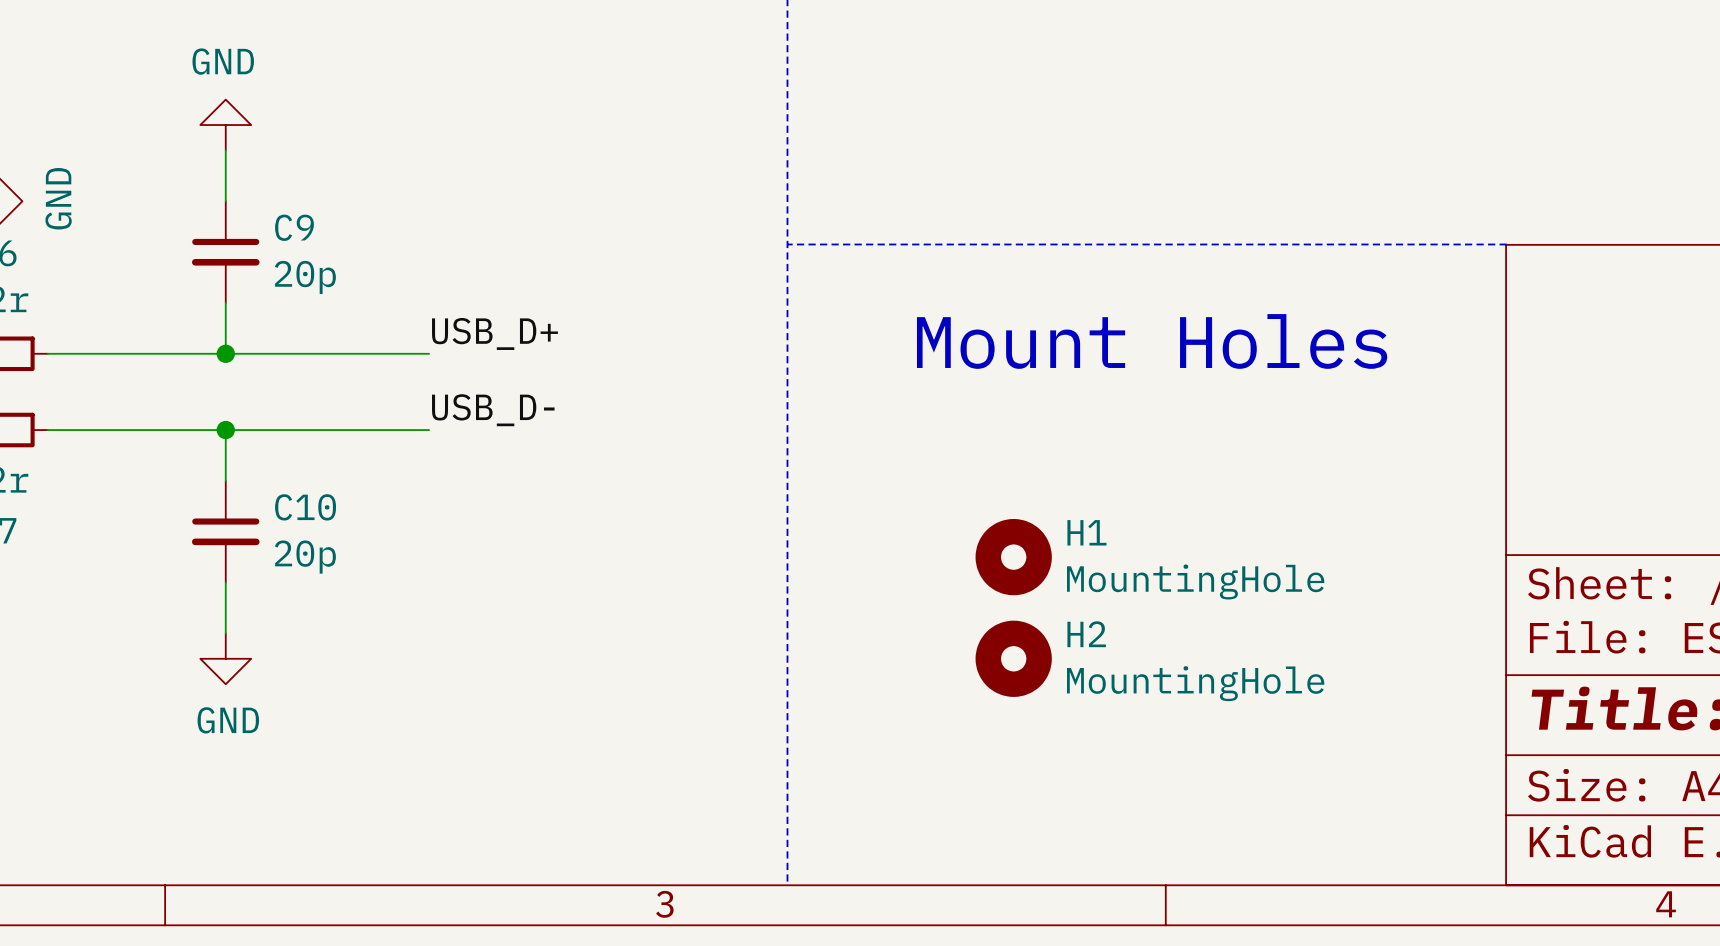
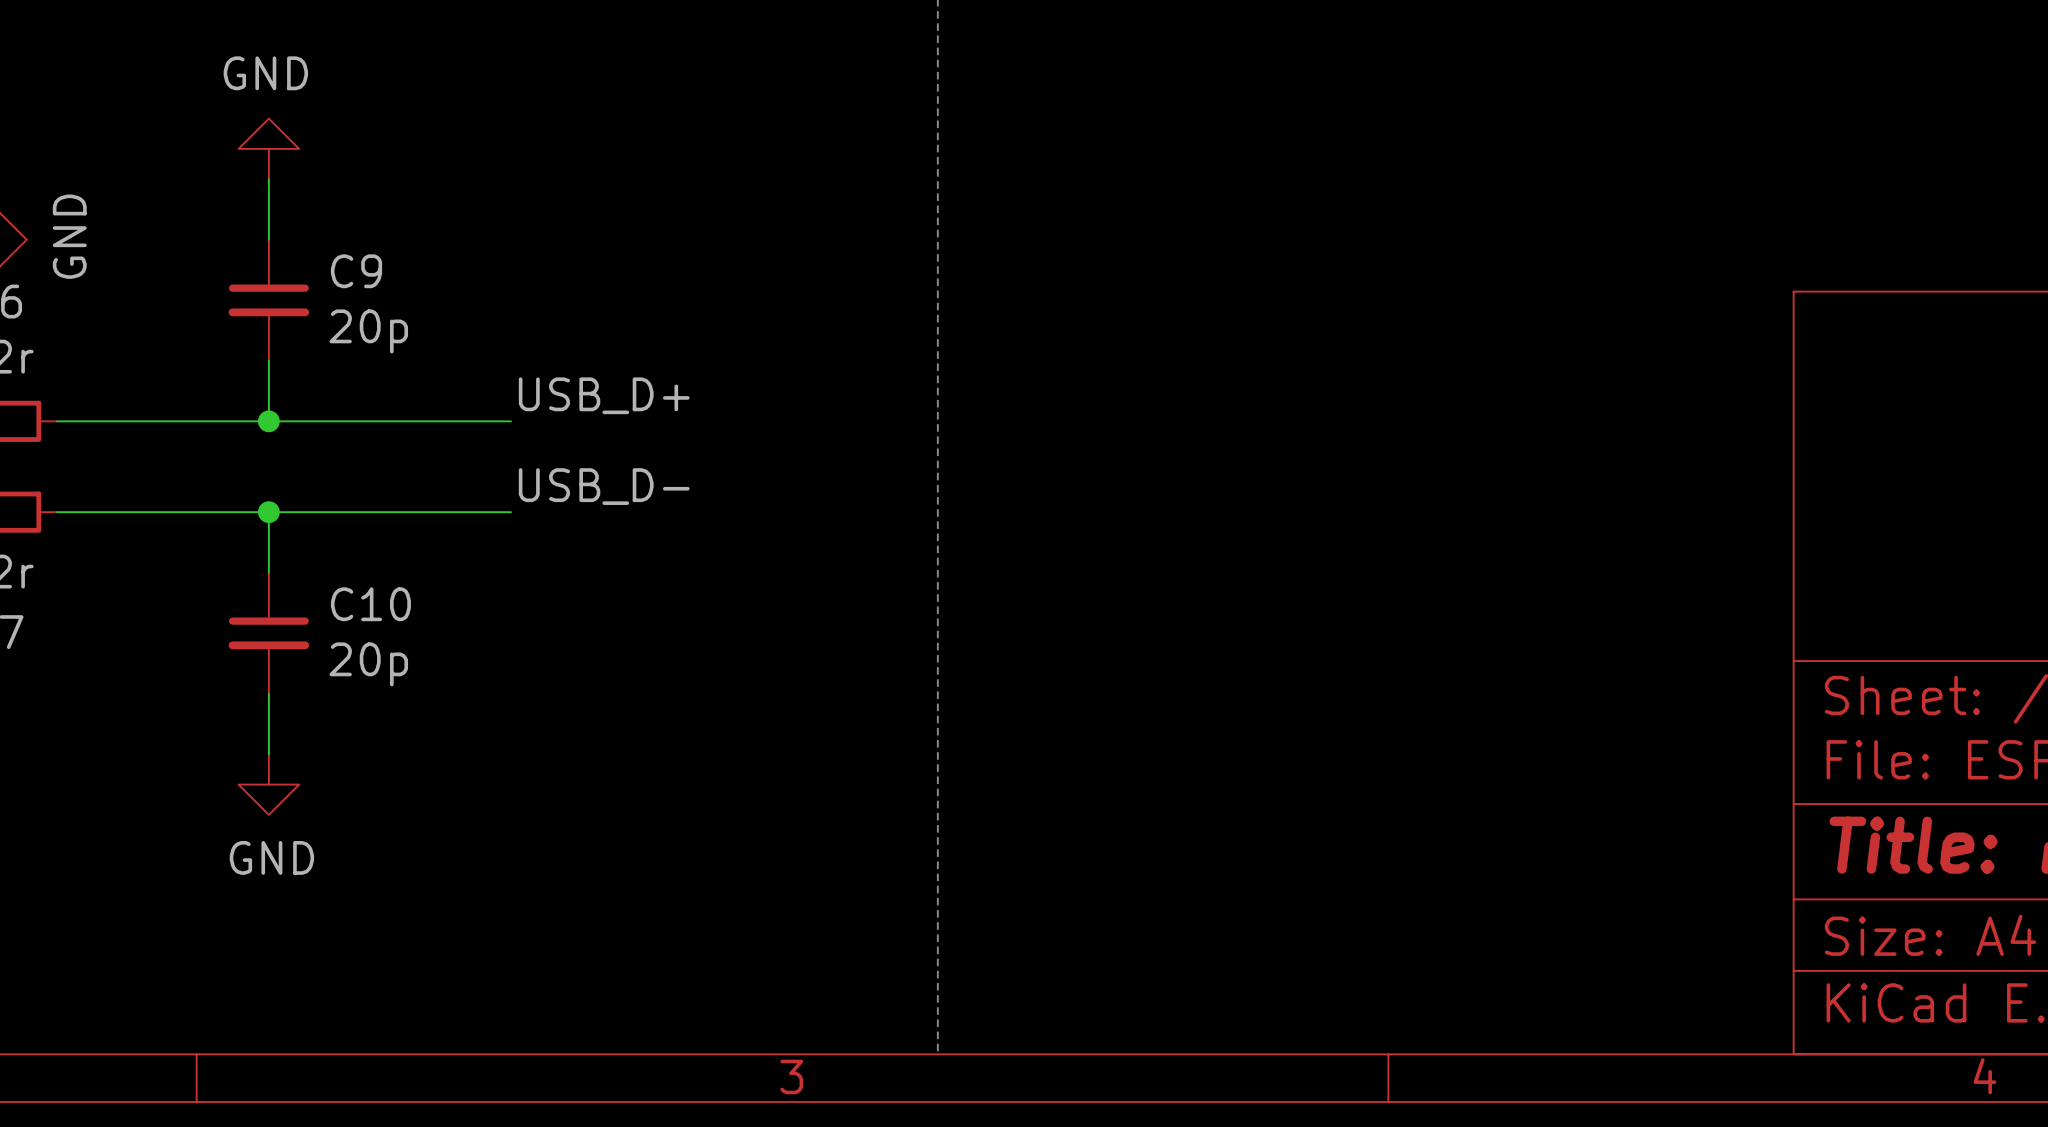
line: (787, 244) (1506, 244) -> none
text: Mount Holes (1152, 341) -> none
H1: MountingHole (1013, 557) -> none
H2: MountingHole (1013, 658) -> none

